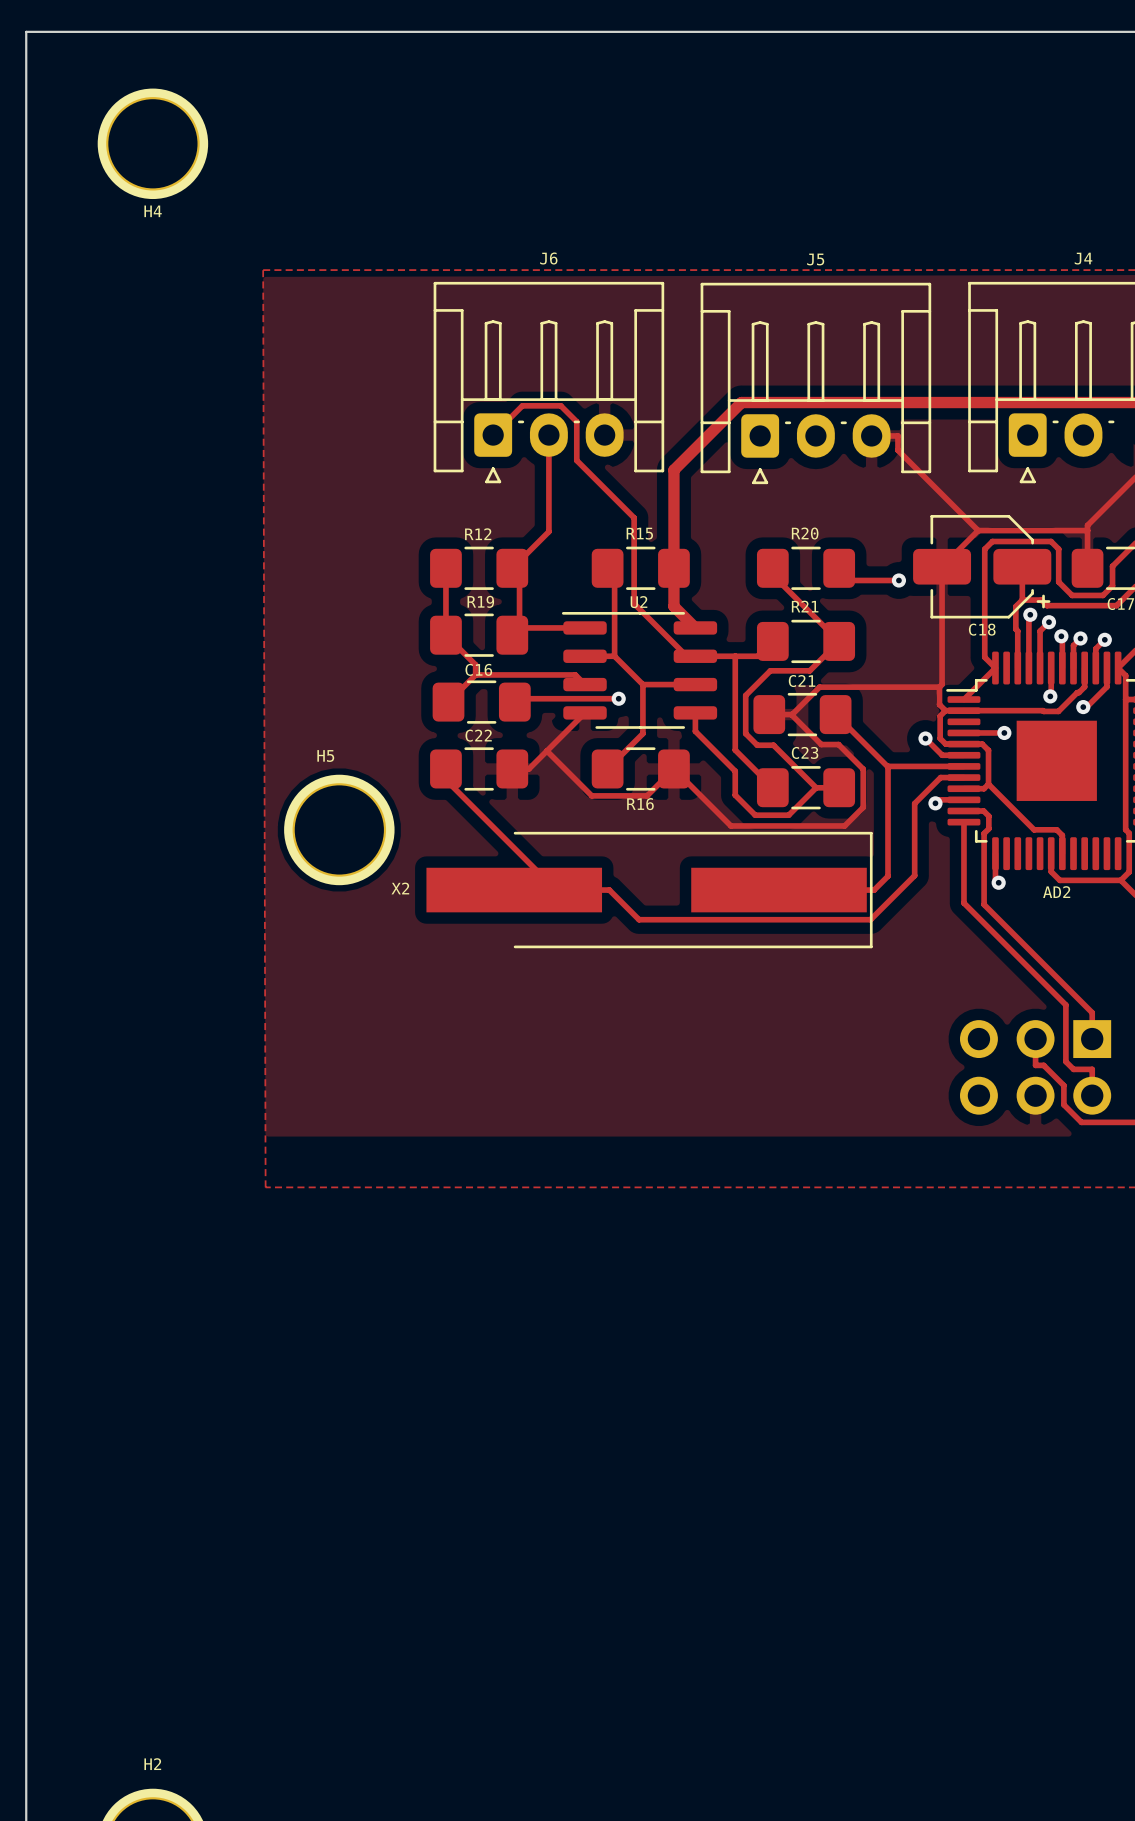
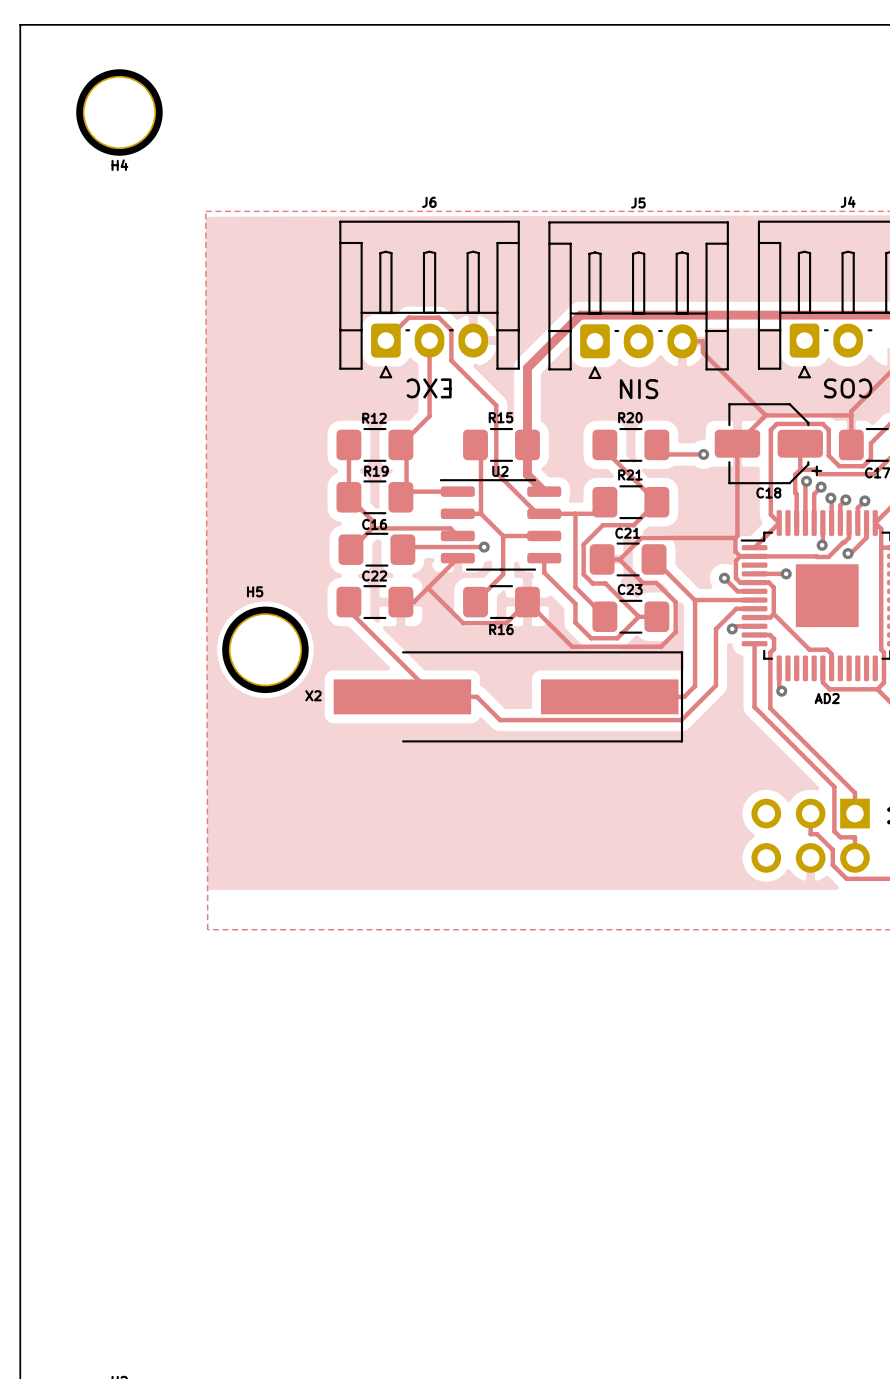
J6 value: none -> EXC (429, 388)
J5 value: none -> SIN (639, 389)
J4 value: none -> COS (848, 388)

